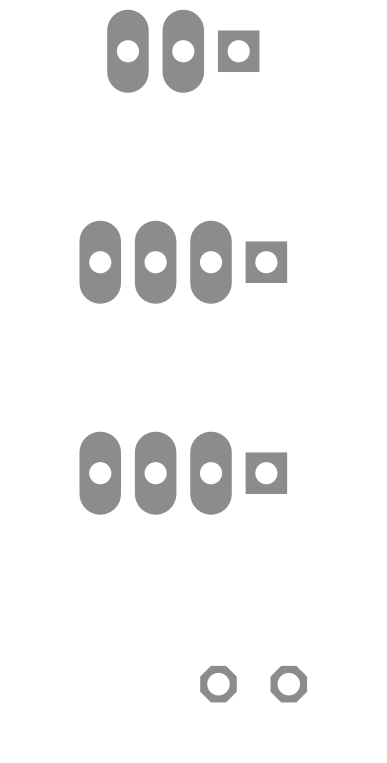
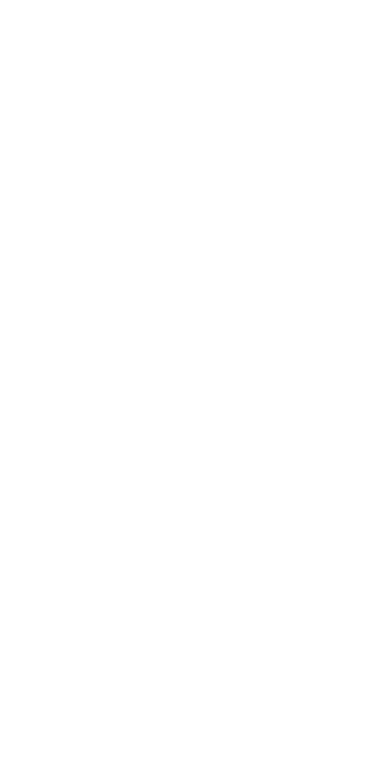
part: (183, 51) -> none
part: (183, 262) -> none
part: (183, 473) -> none
part: (253, 684) -> none

